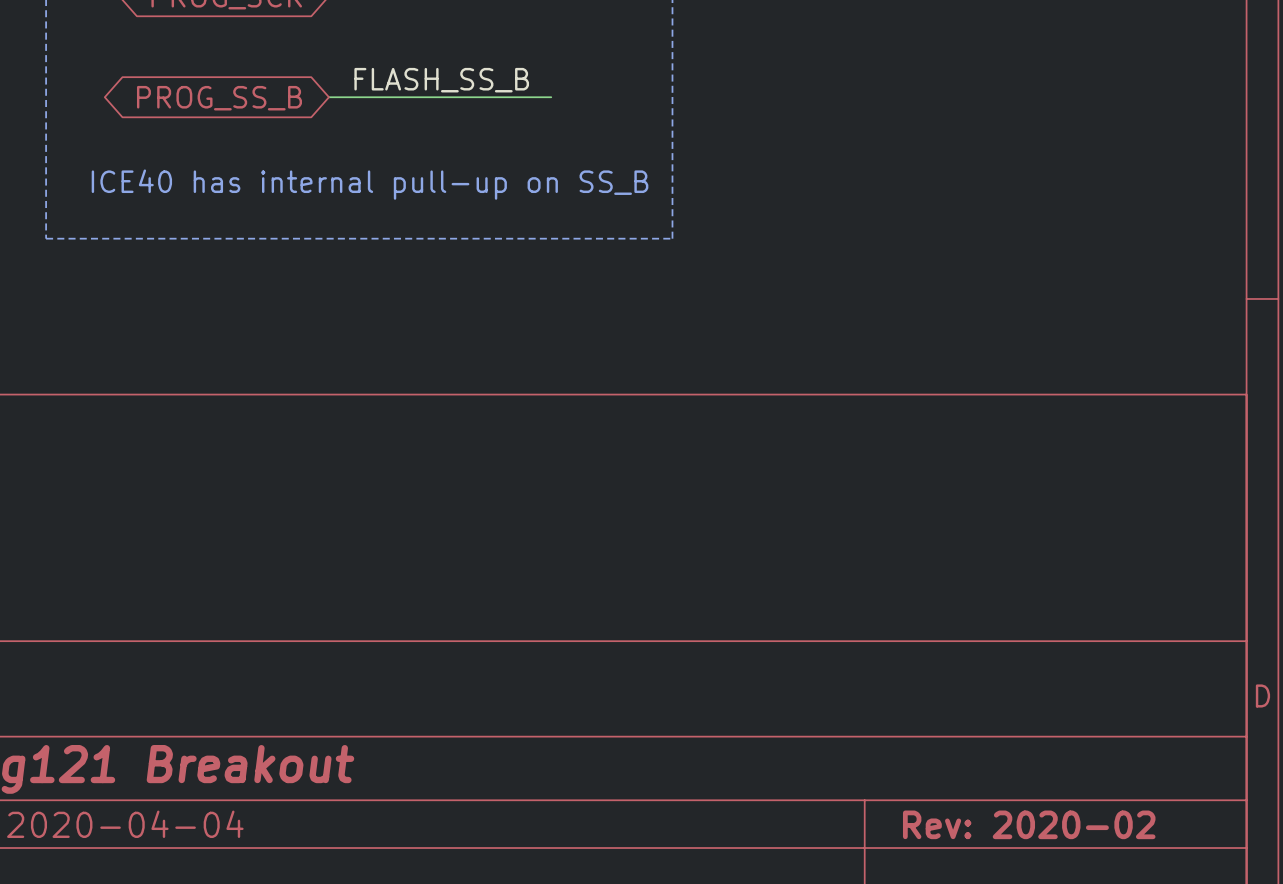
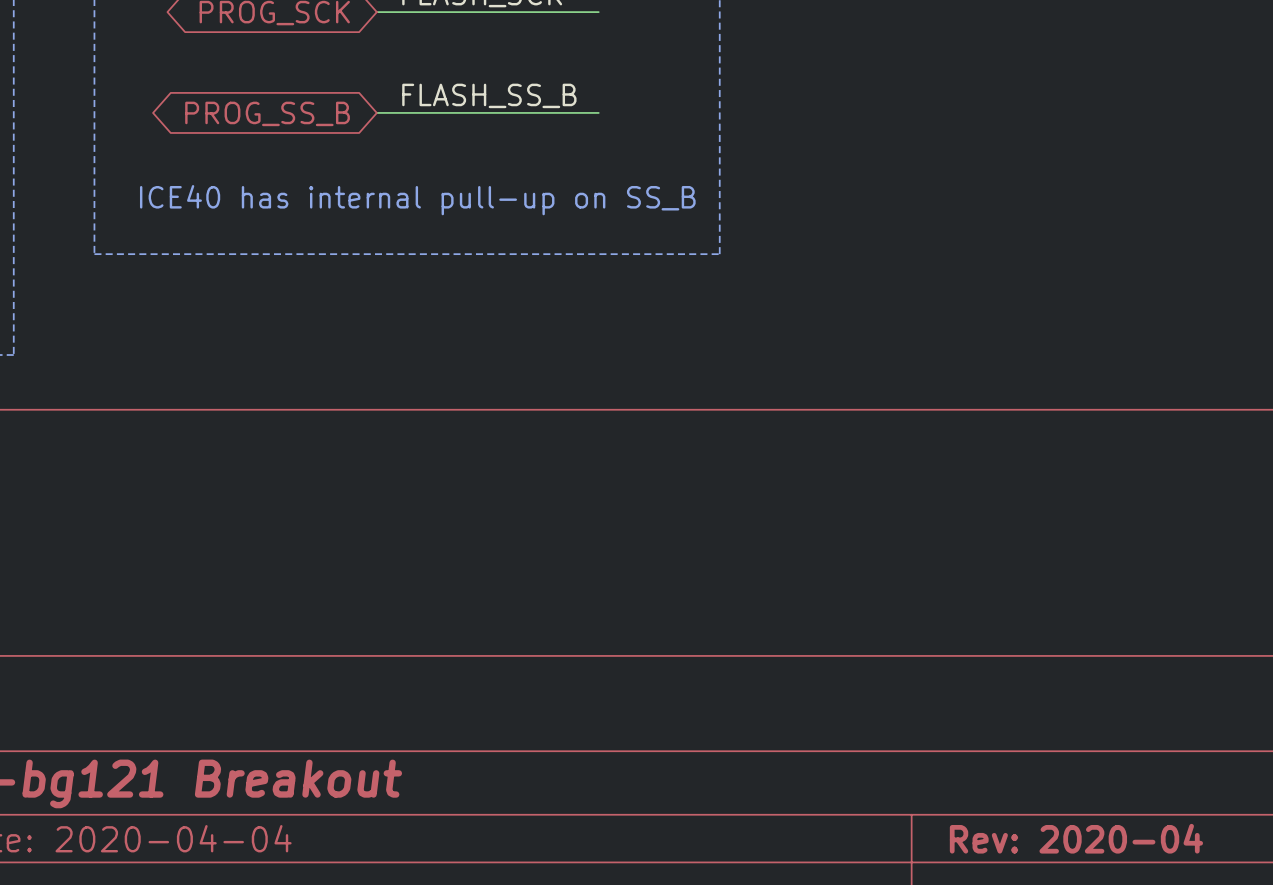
title block: Rev: 2020-02 (1029, 824) -> Rev: 2020-04 (1076, 838)

